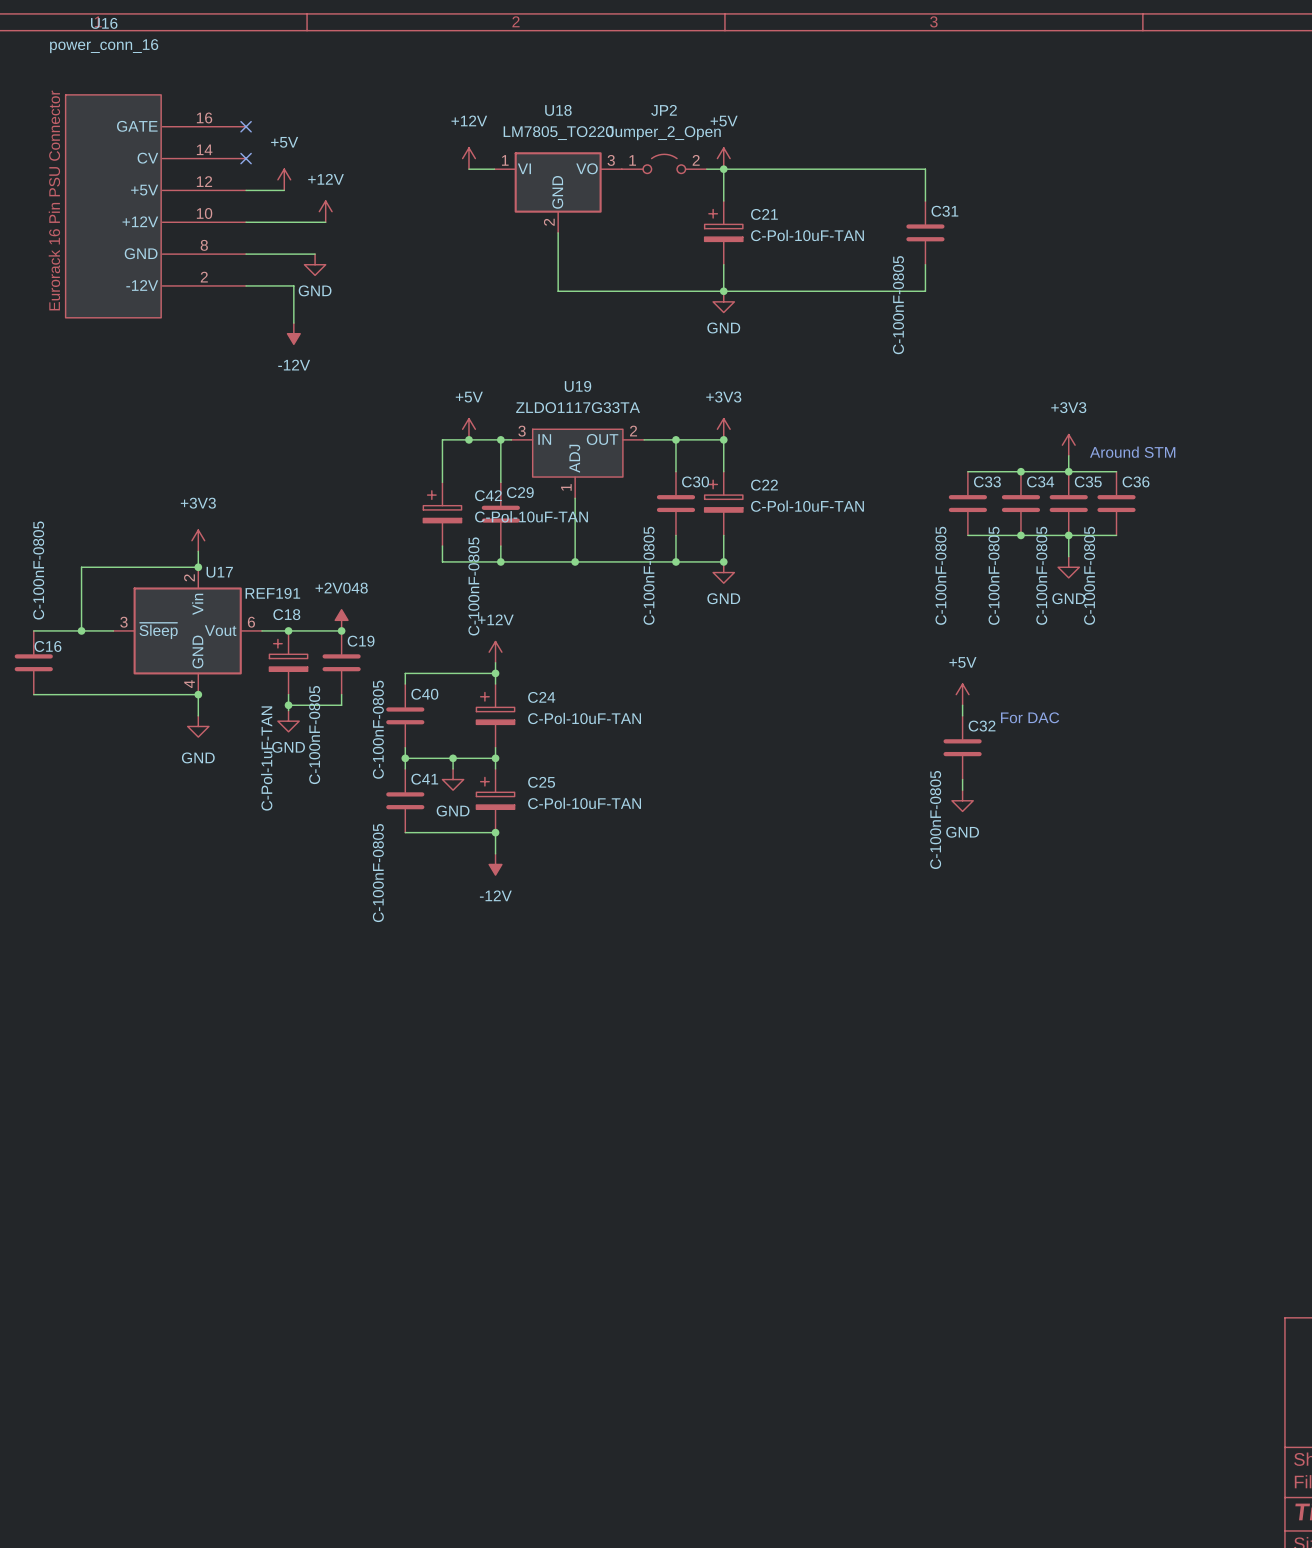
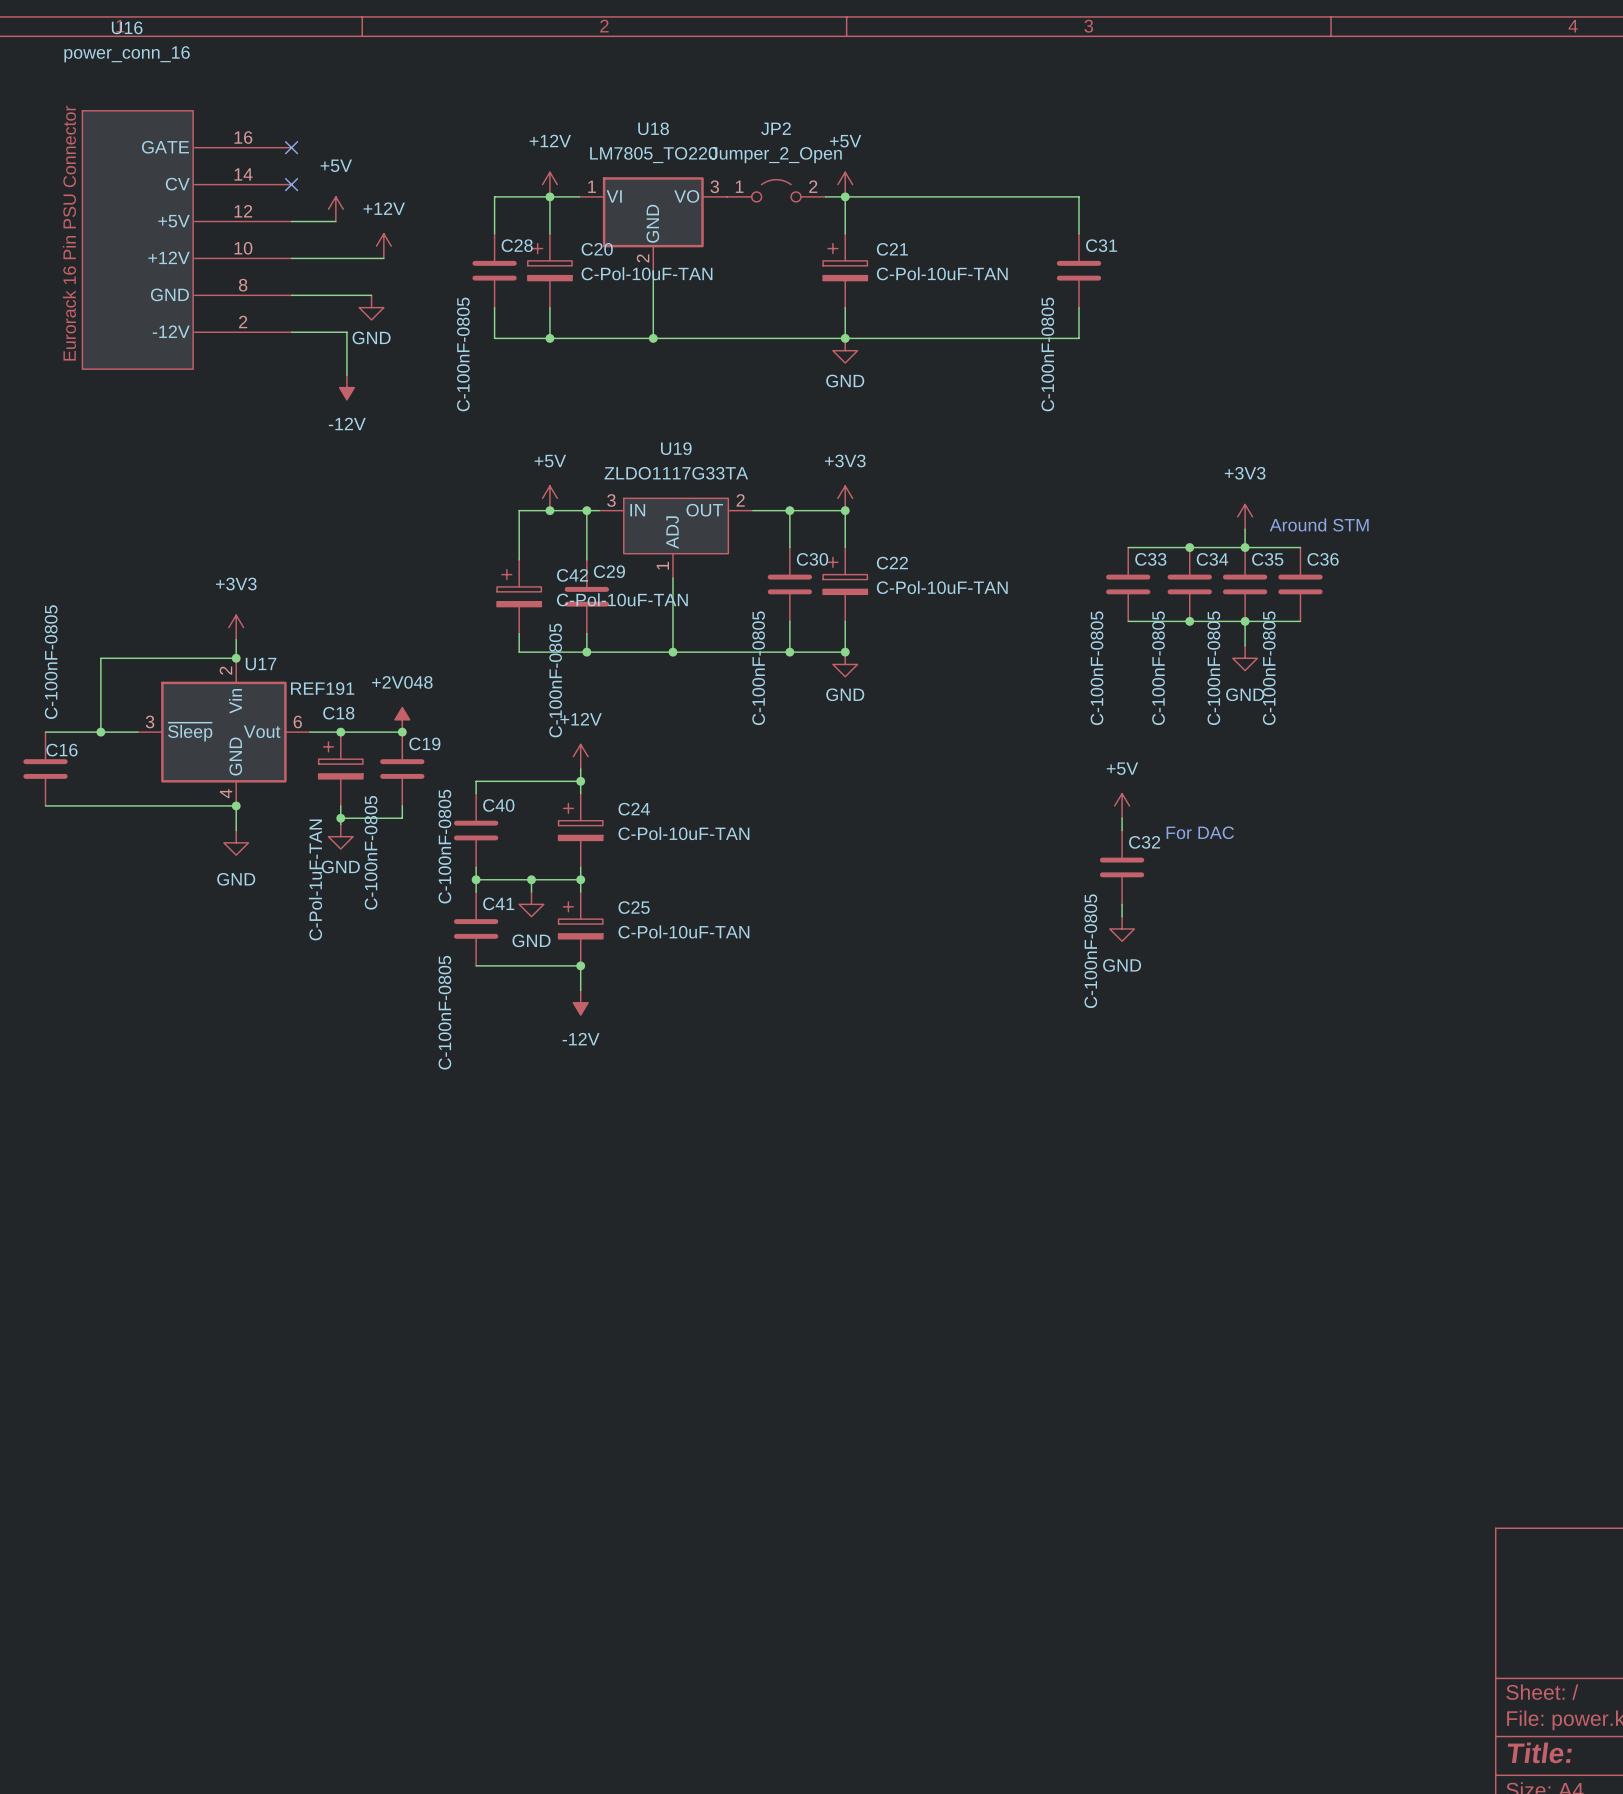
junction: none -> (549, 196)
wire: none -> (494, 233) (494, 196) (549, 196) (549, 233)
C28: none -> C-100nF-0805 (494, 270)
C20: none -> C-Pol-10uF-TAN (549, 270)
wire: none -> (494, 307) (494, 338) (653, 338)
wire: none -> (549, 307) (549, 338)
junction: none -> (549, 338)
junction: none -> (653, 338)

